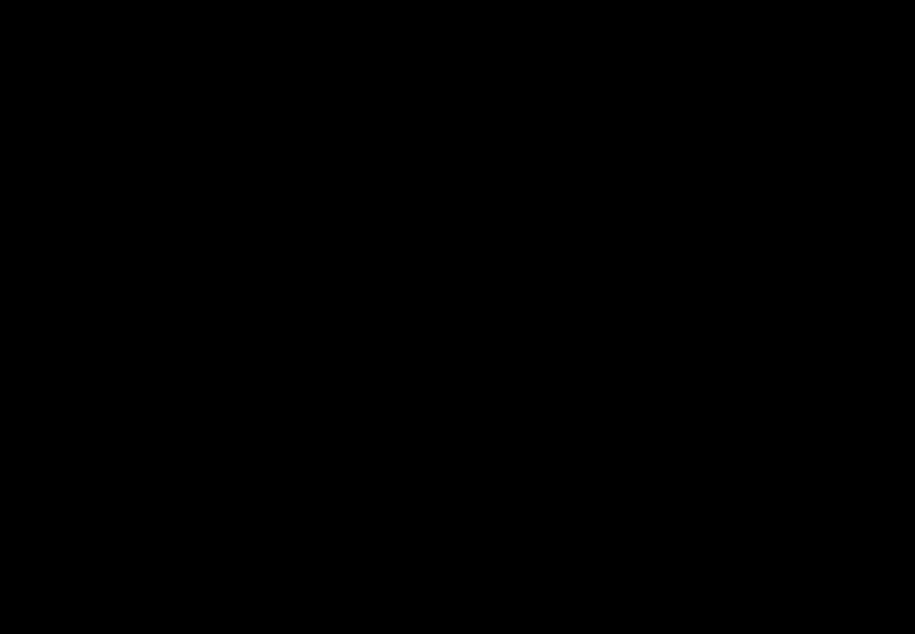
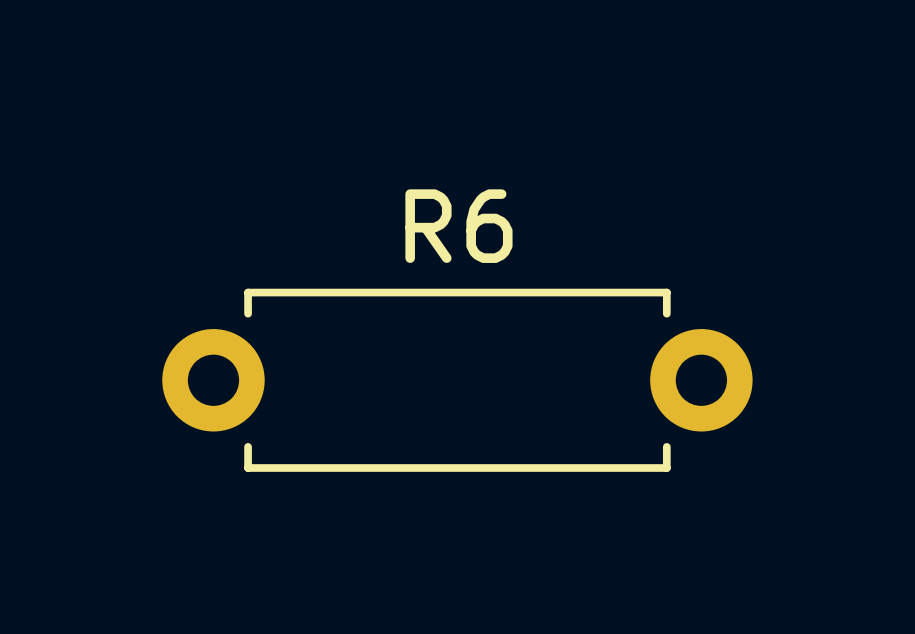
R6: none -> (457, 380)

